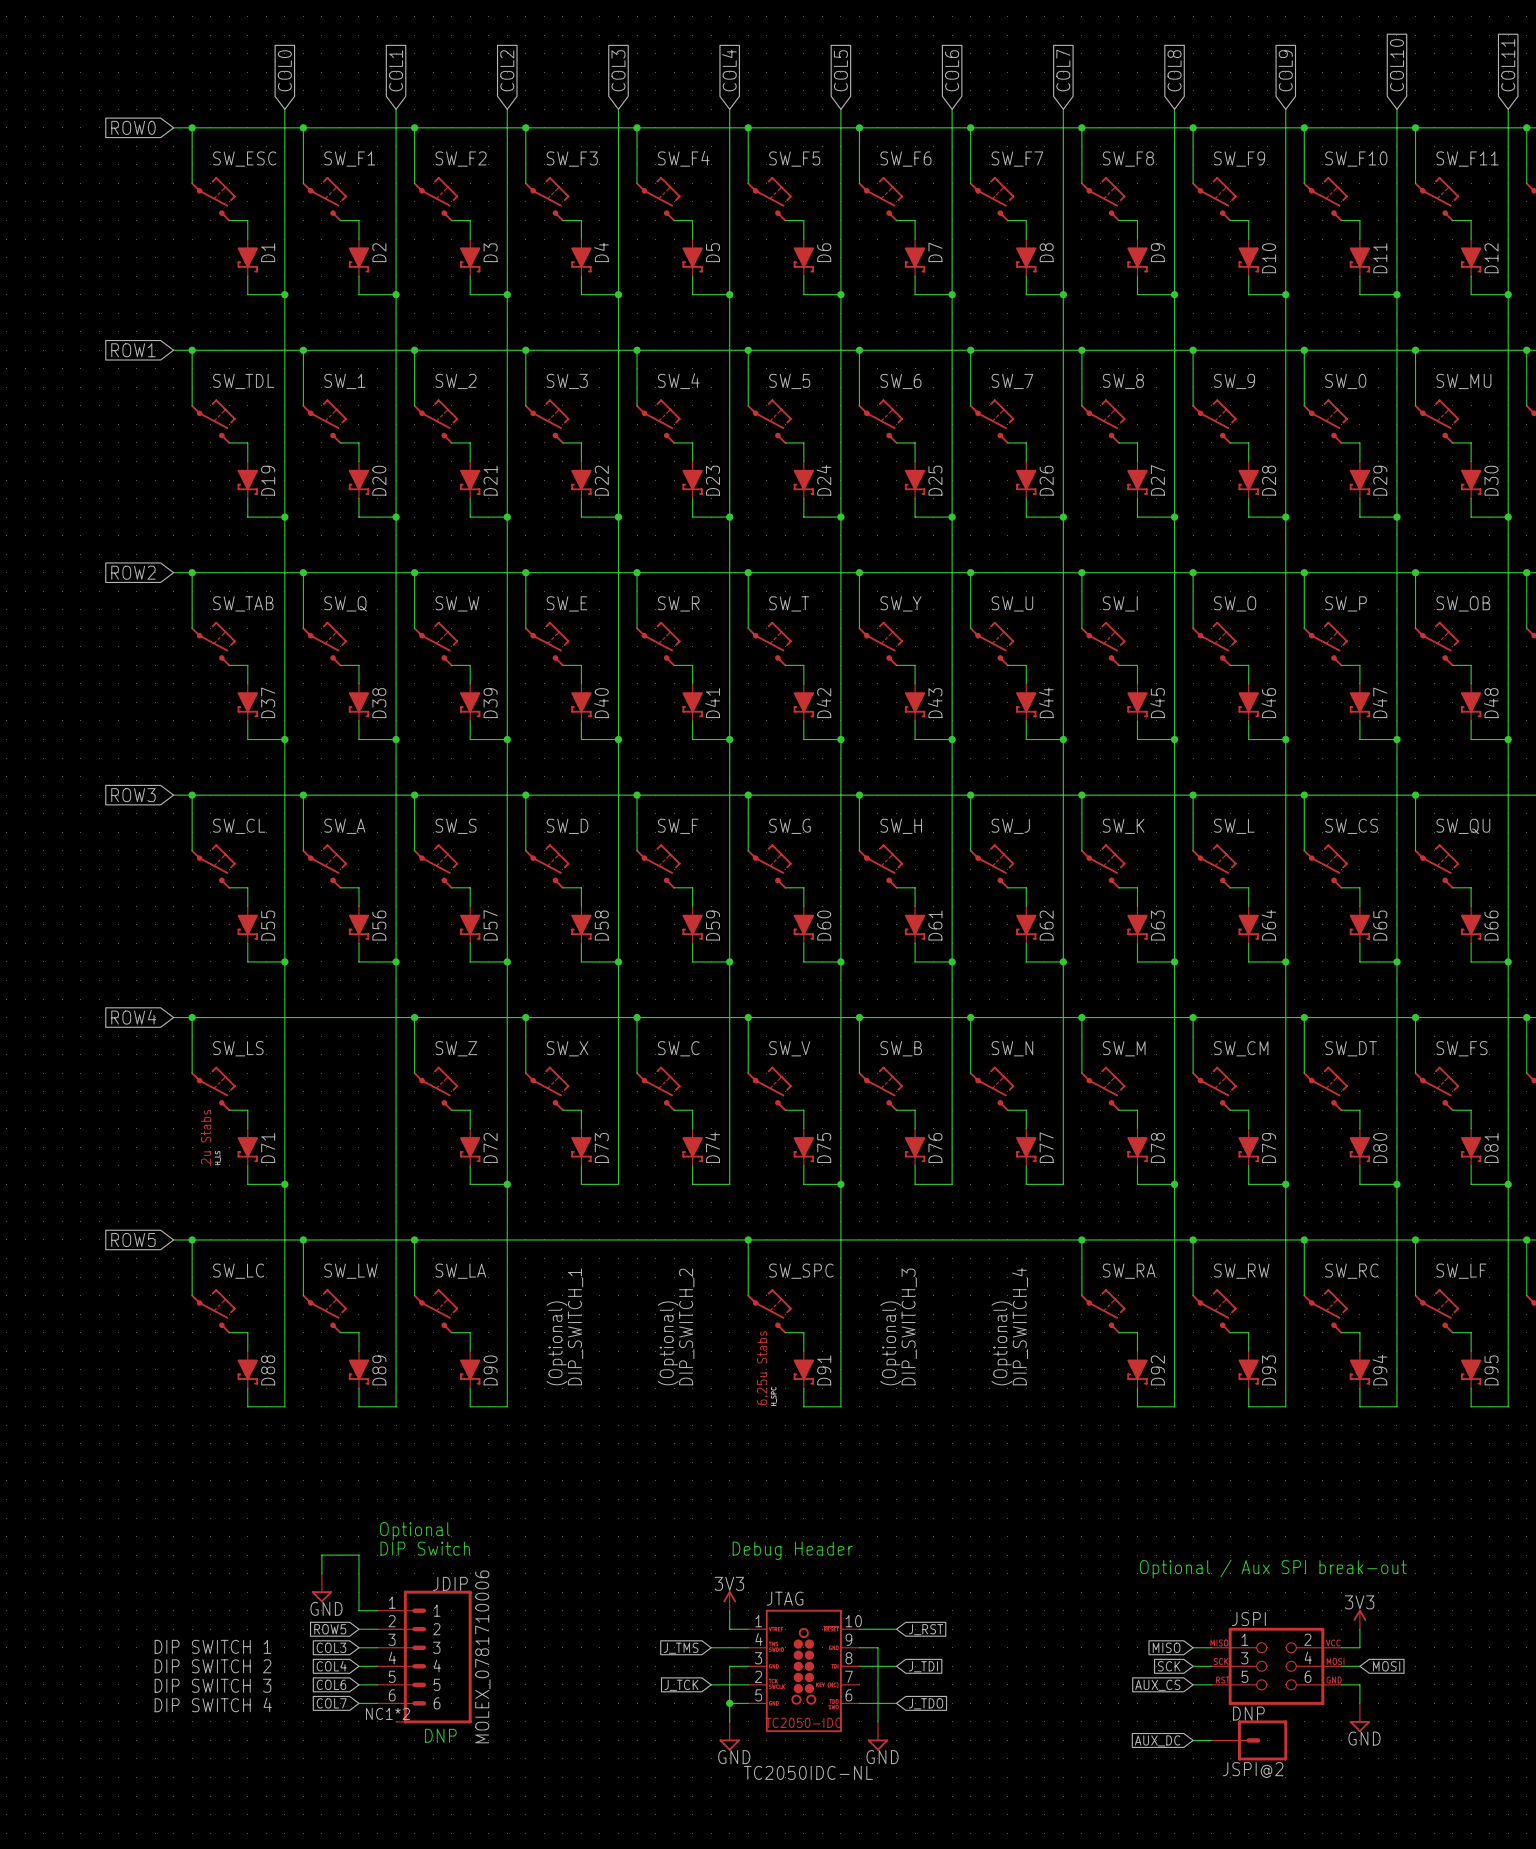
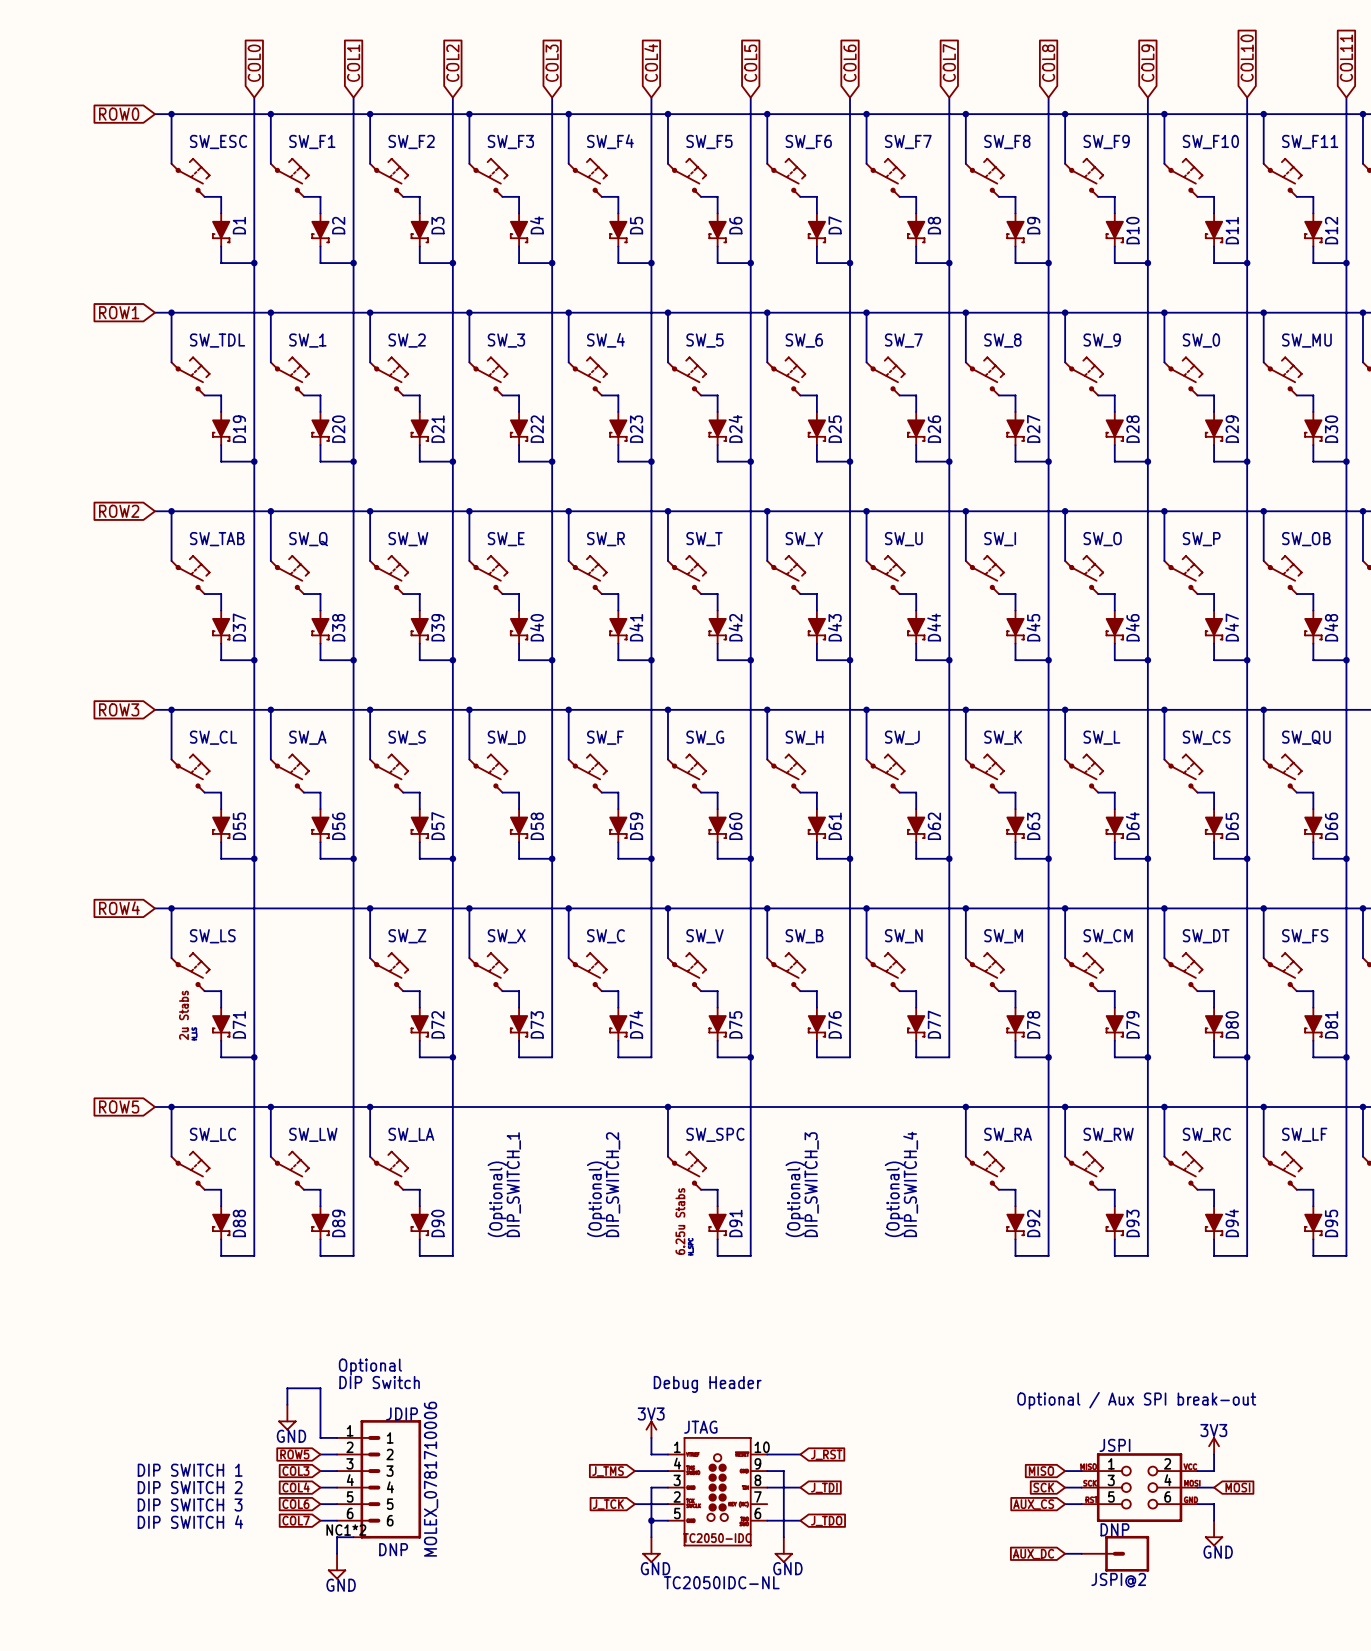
wire: none -> (353, 1537) (337, 1537) (337, 1553)
power symbol: none -> GND (337, 1566)

